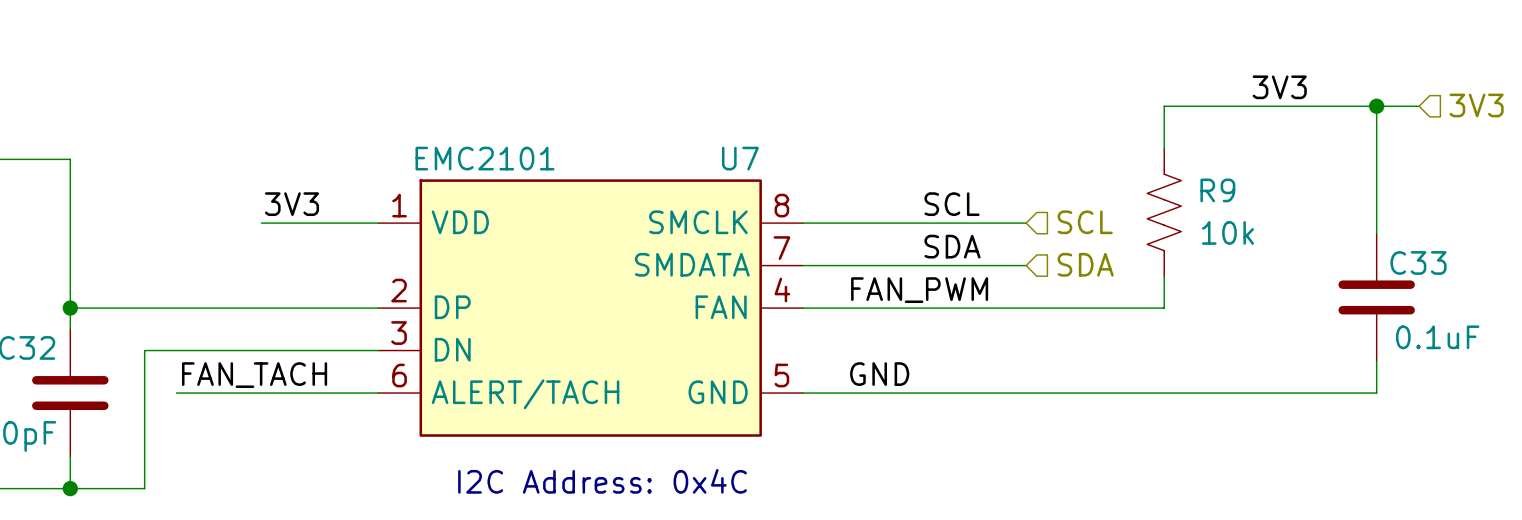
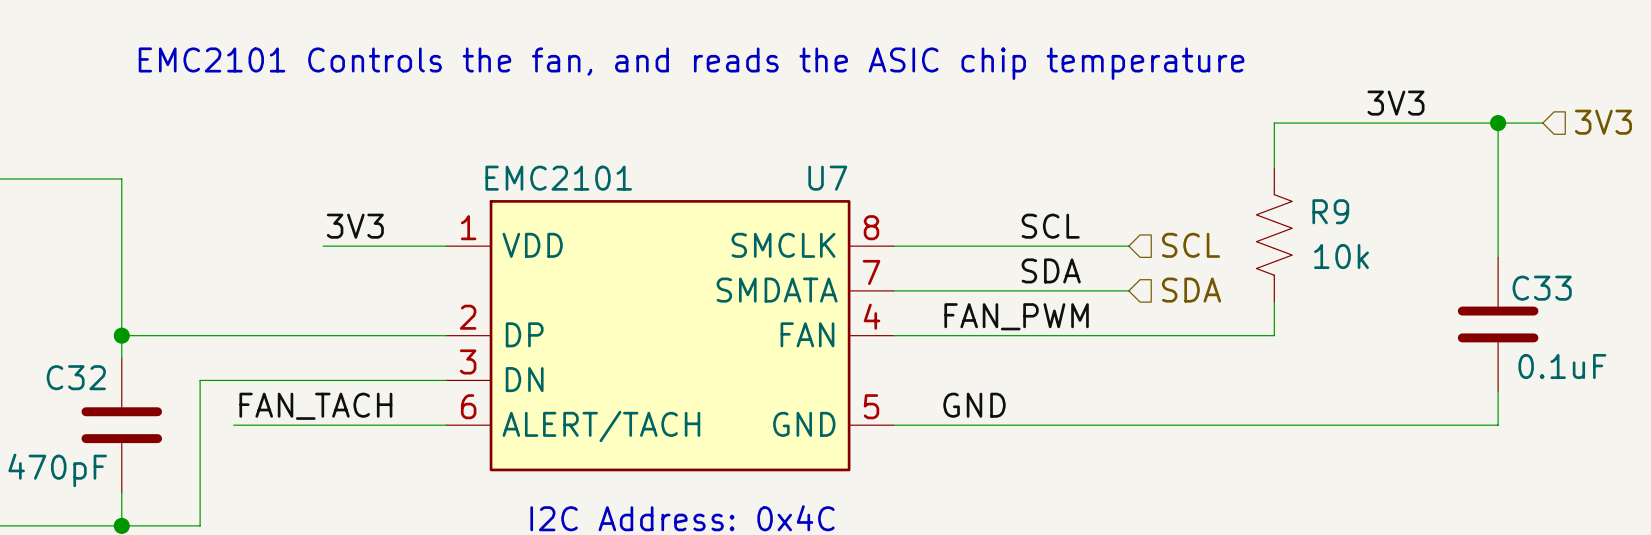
text: none -> EMC2101 Controls the fan, and reads the ASIC chip temperature (691, 63)

